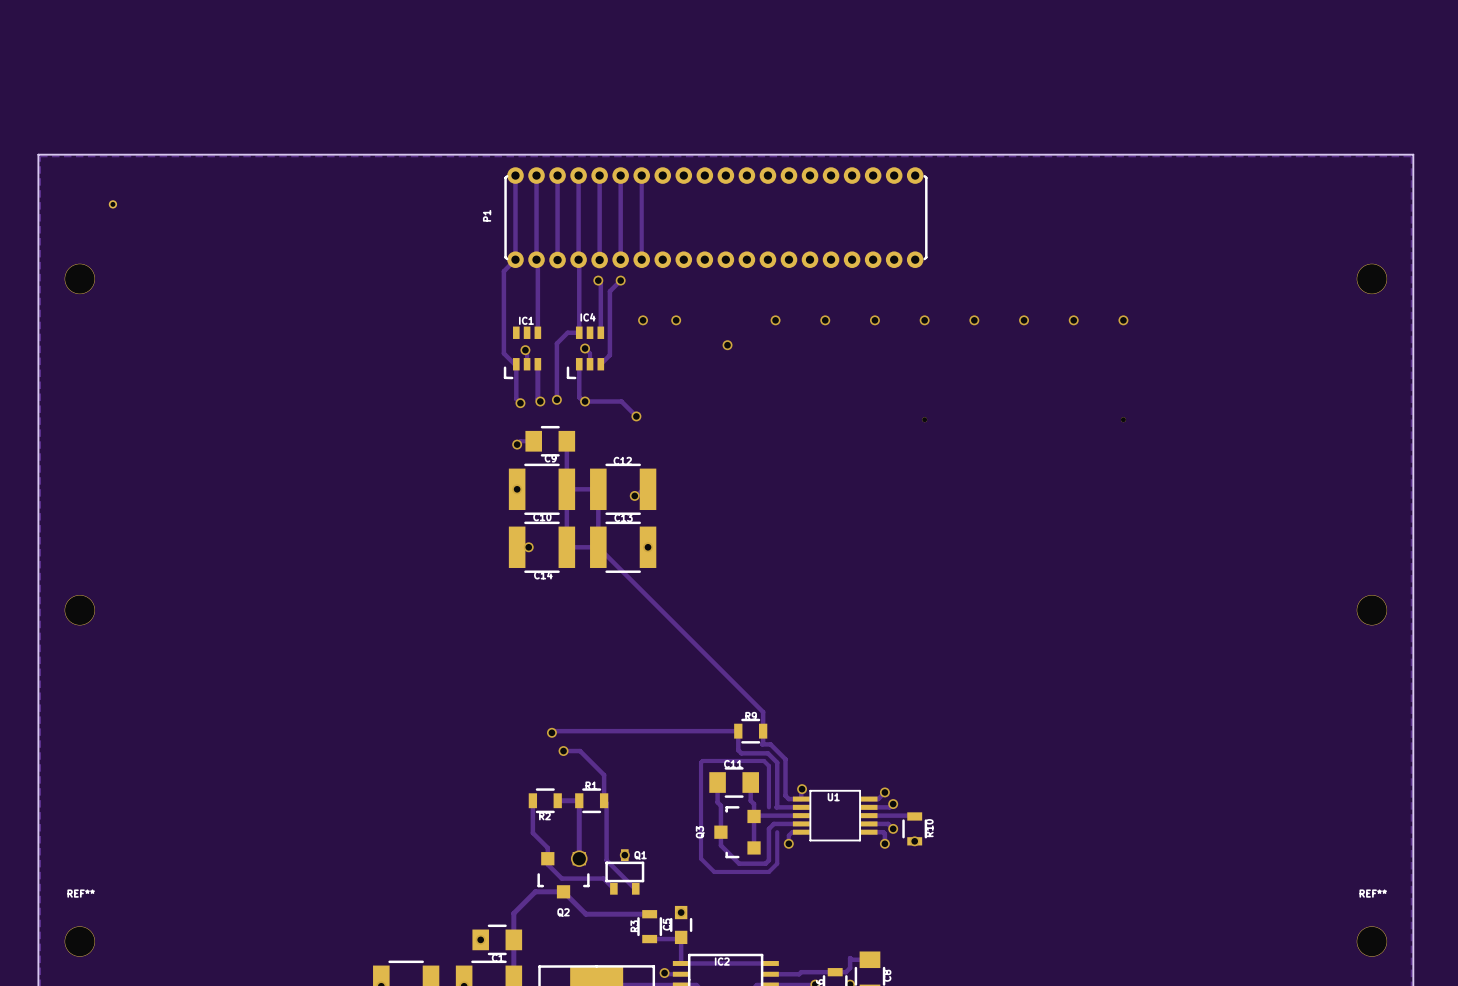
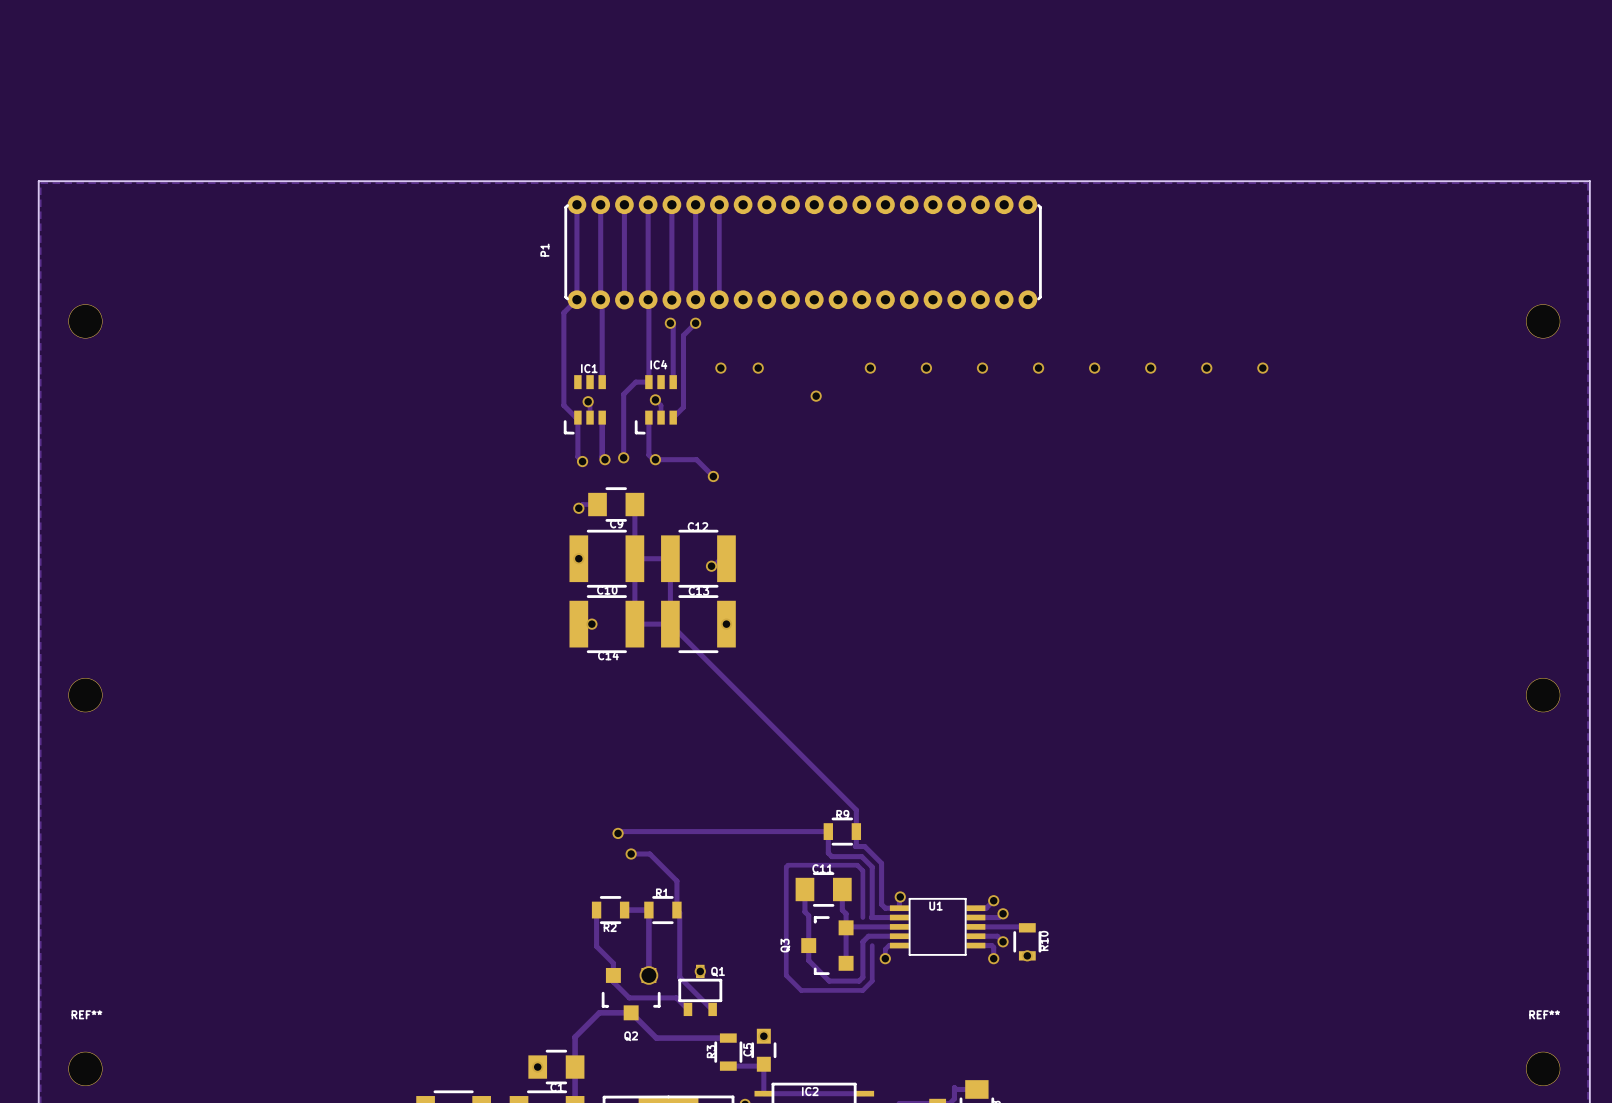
part: (112, 204) -> none
part: (924, 419) -> none
part: (1123, 419) -> none

